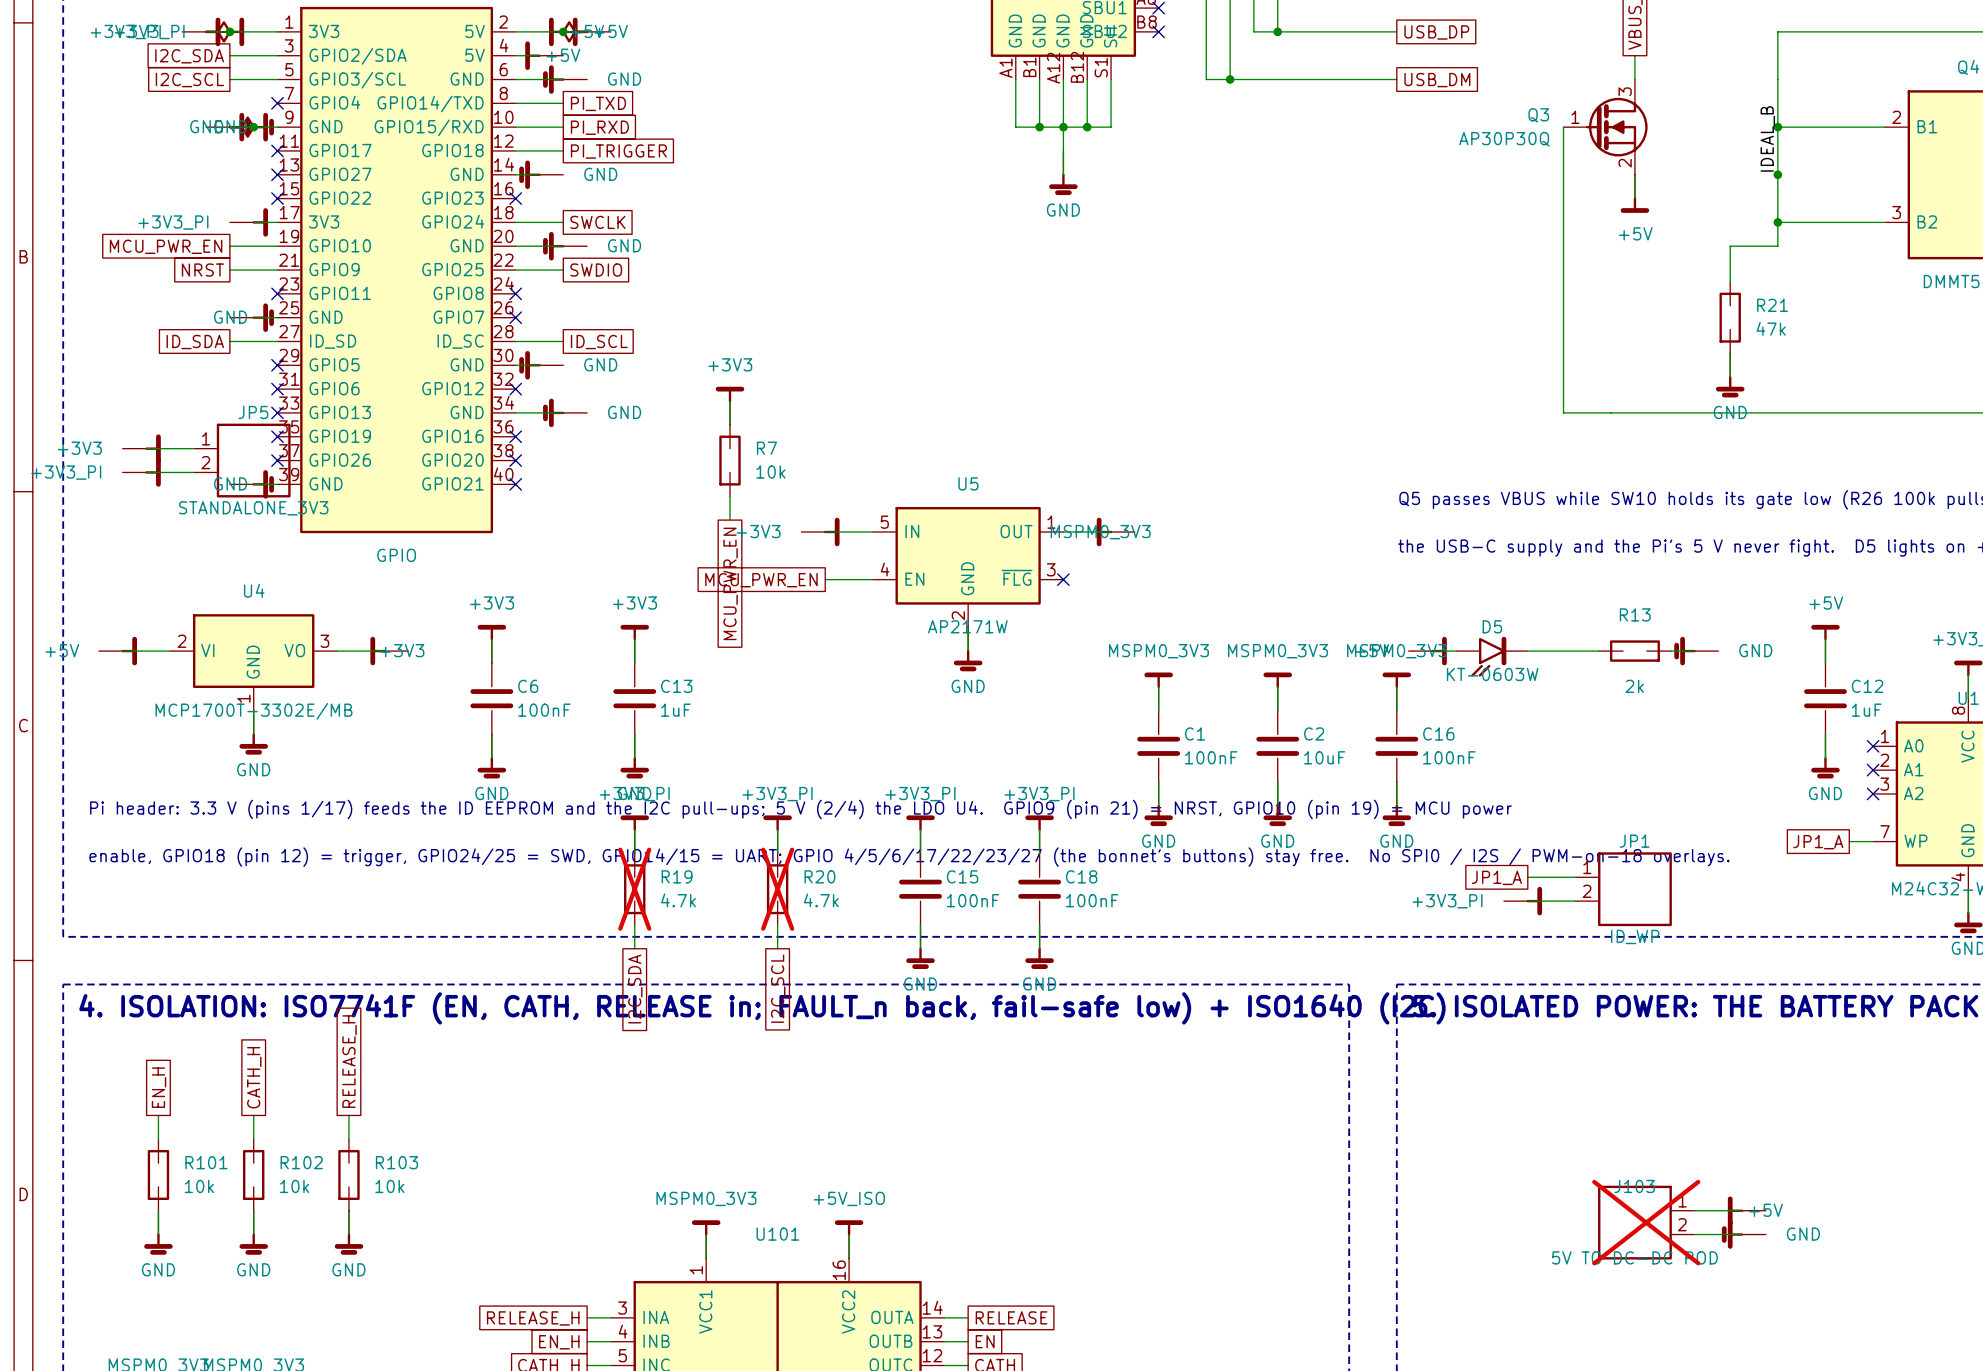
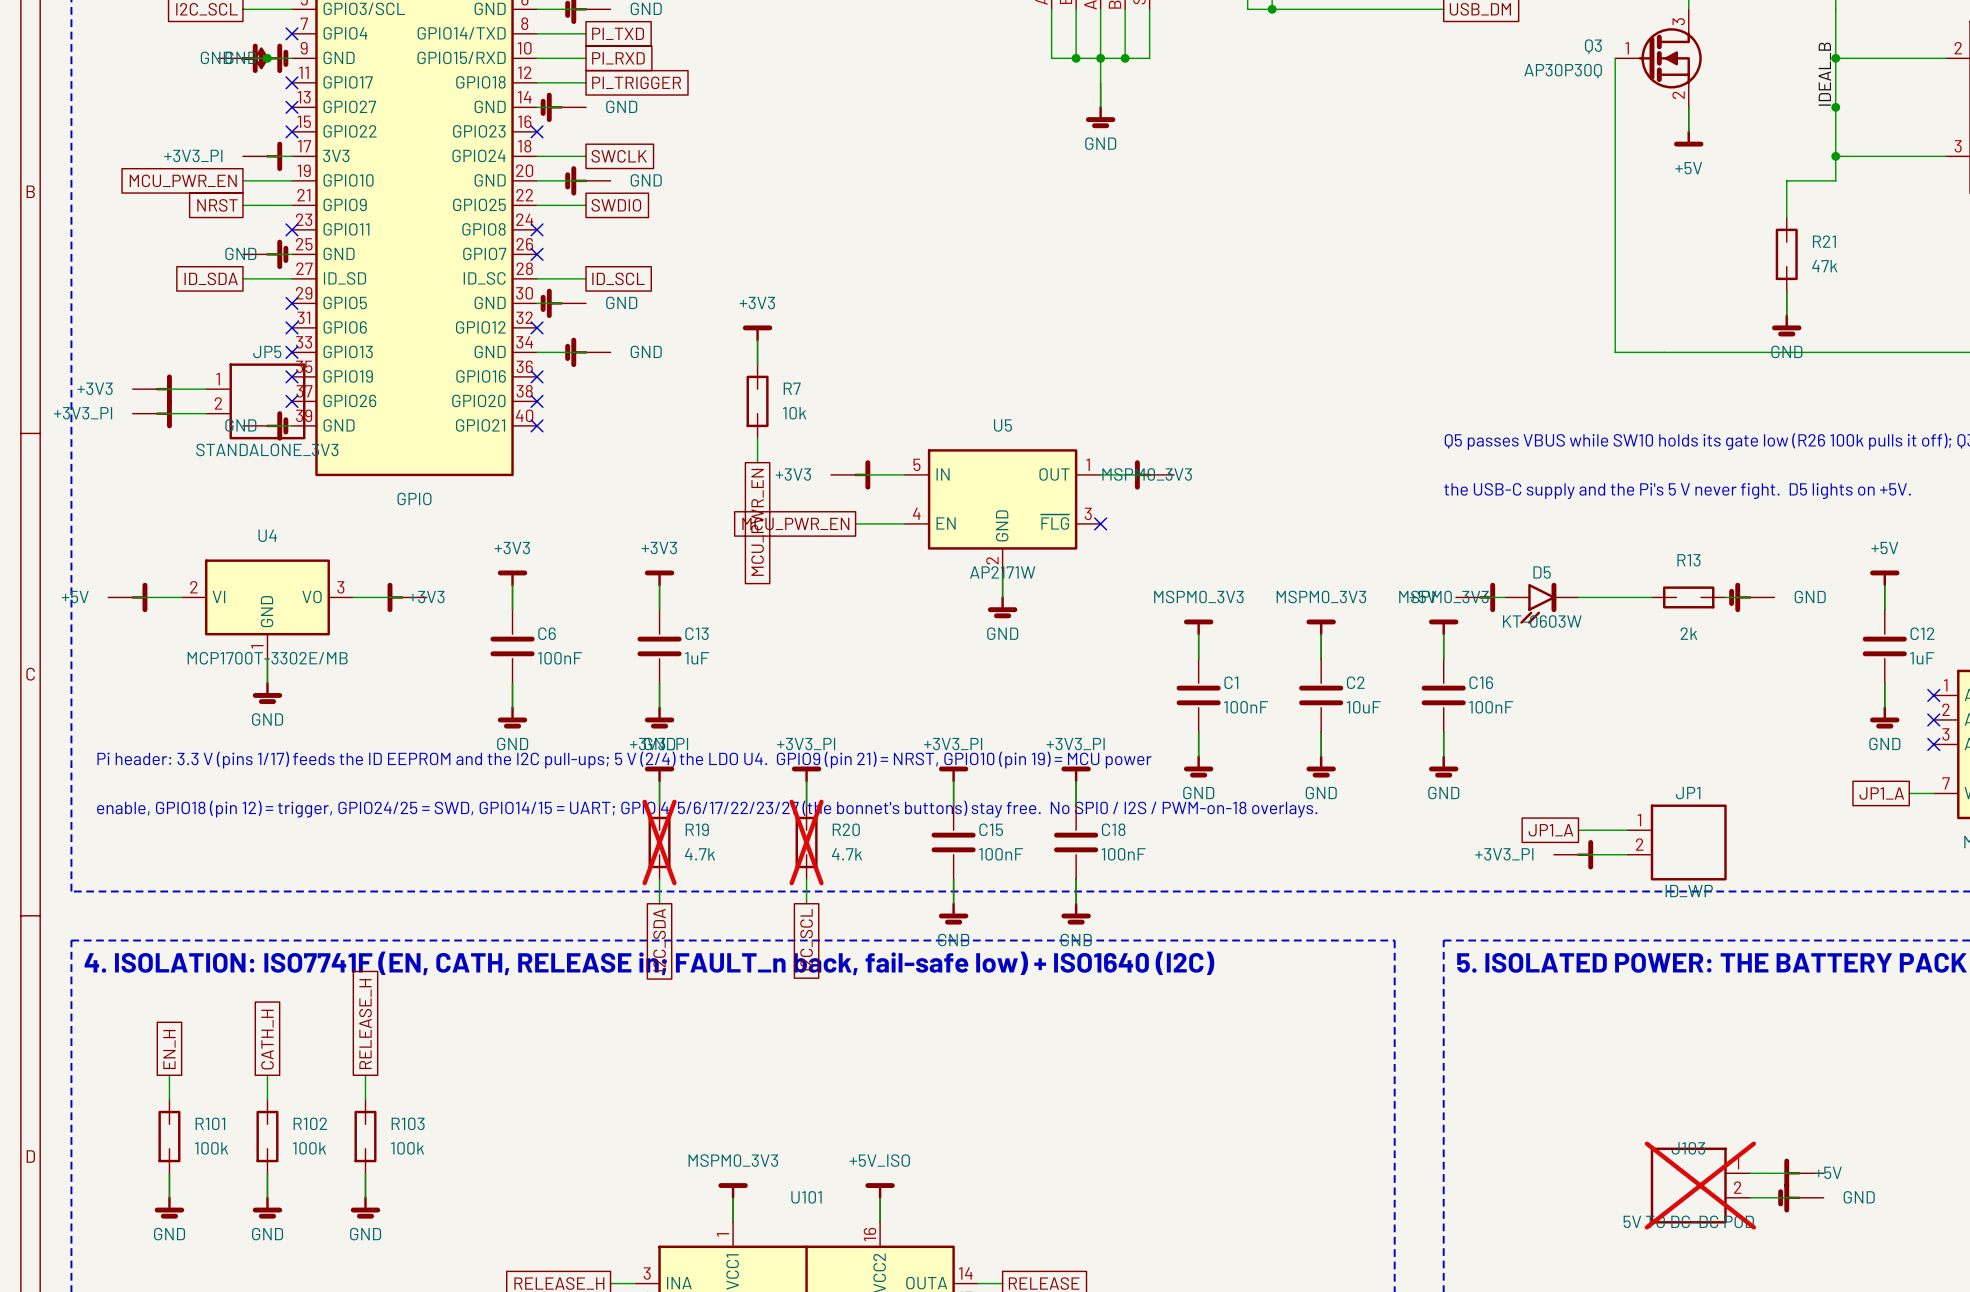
R101 value: 10k (199, 1186) -> 100k (211, 1148)
R102 value: 10k (294, 1186) -> 100k (309, 1148)
R103 value: 10k (389, 1186) -> 100k (407, 1148)

